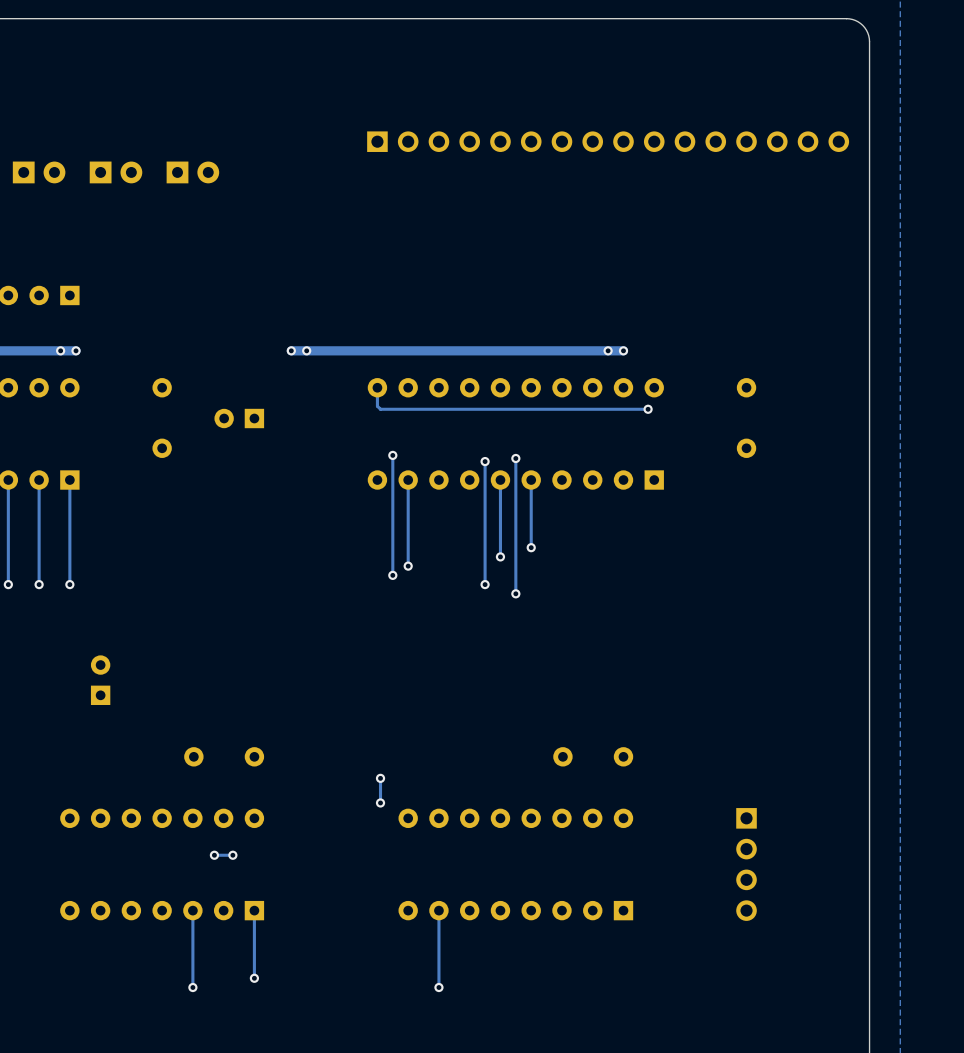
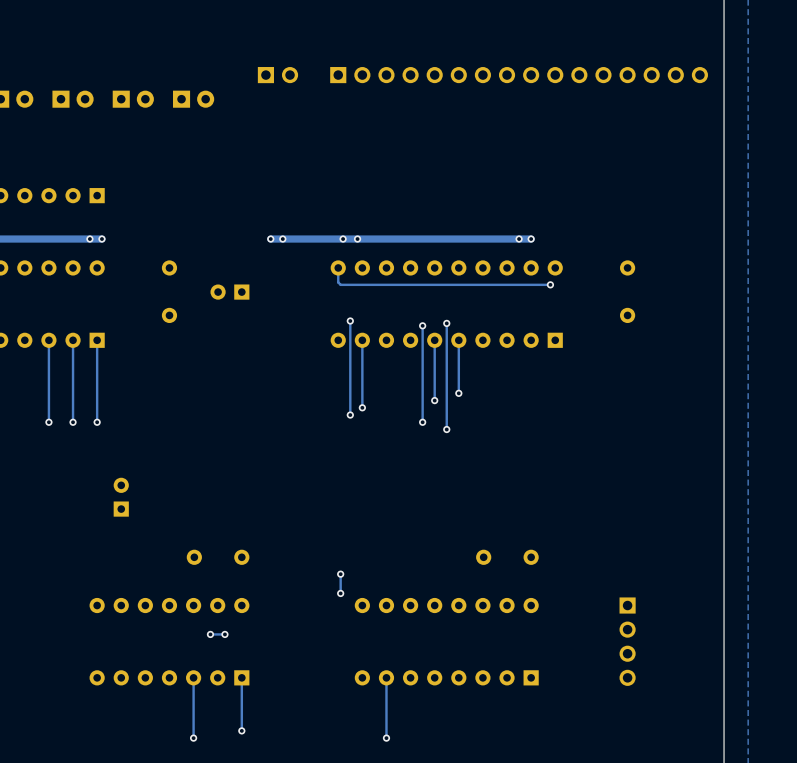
part: none -> (277, 75)
via: none -> (343, 239)
via: none -> (357, 239)

